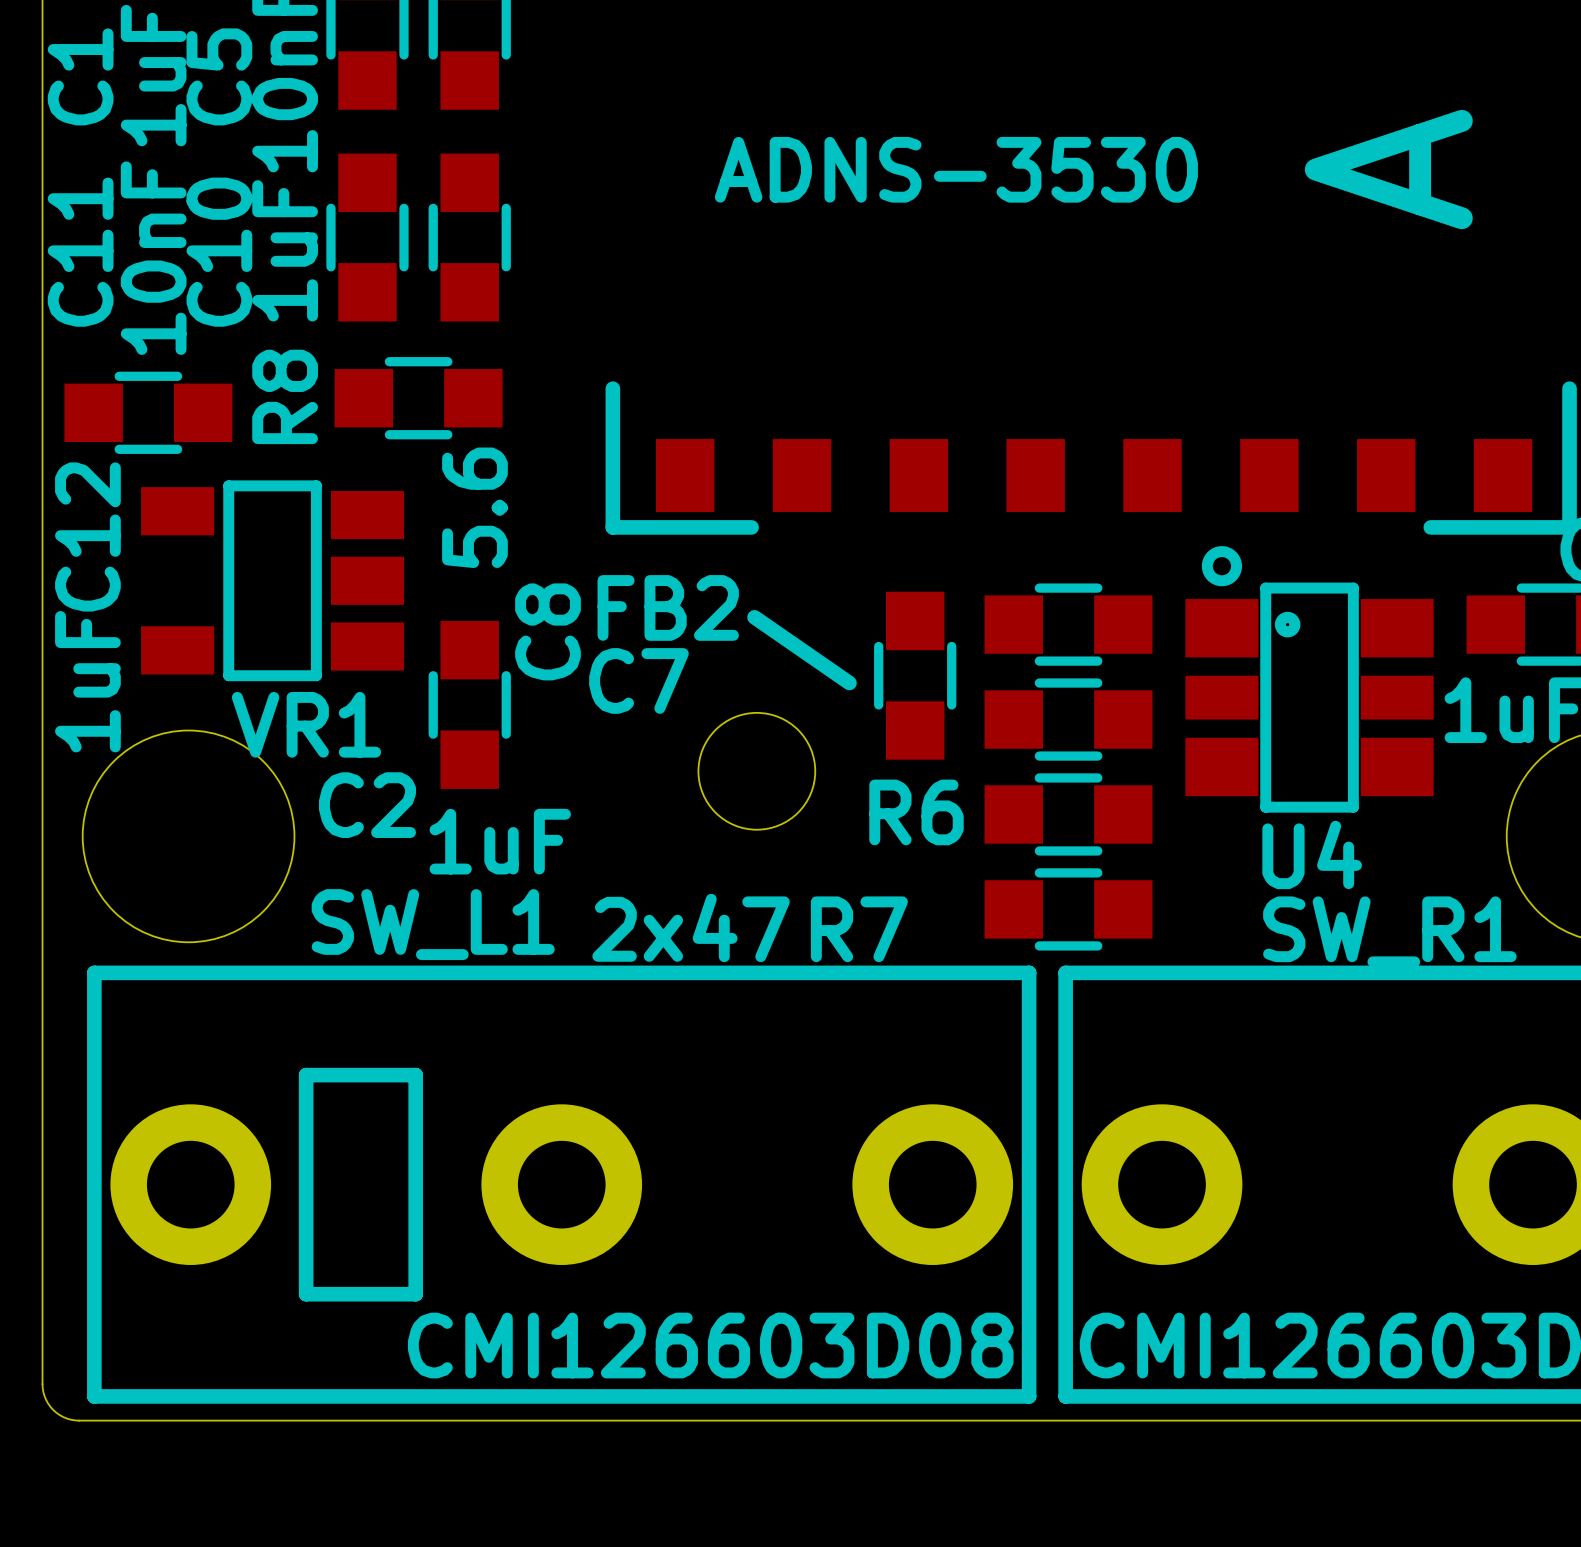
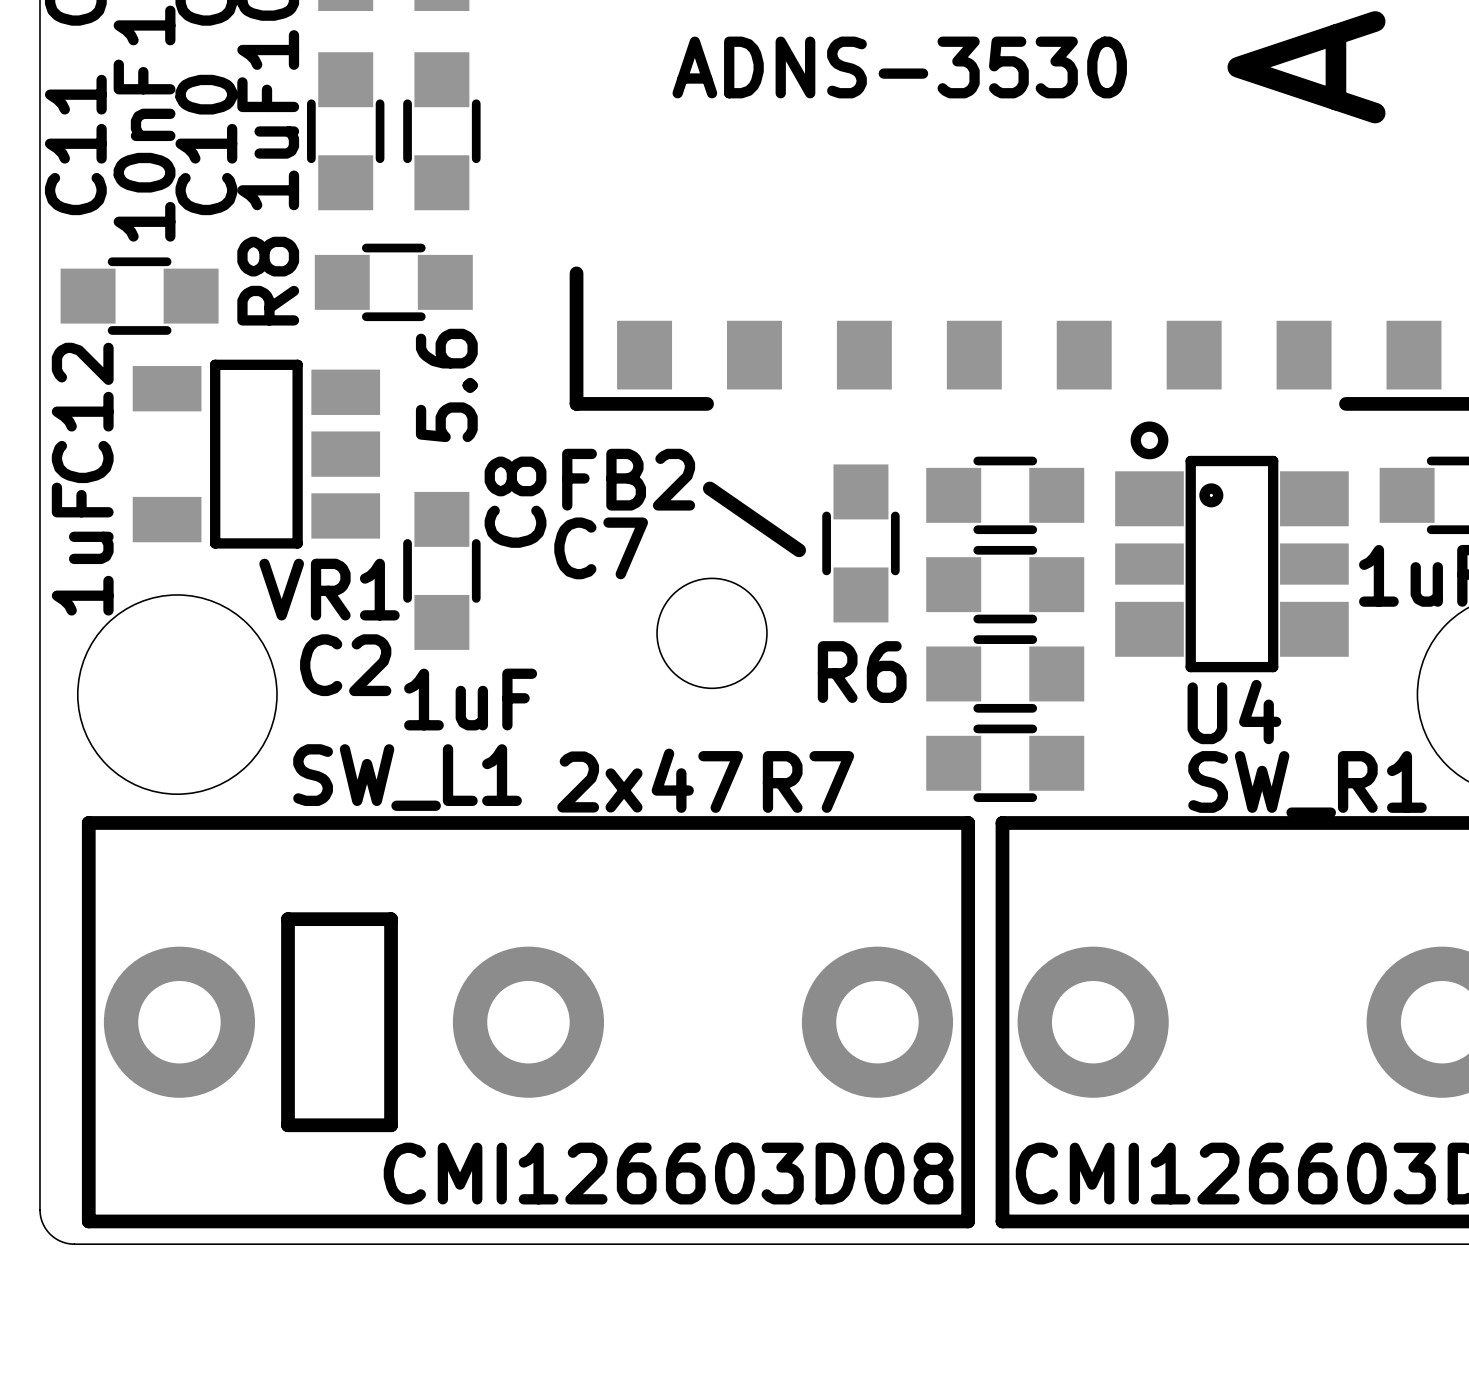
VR1 name position: VR1 (306, 724) -> VR1 (329, 589)

